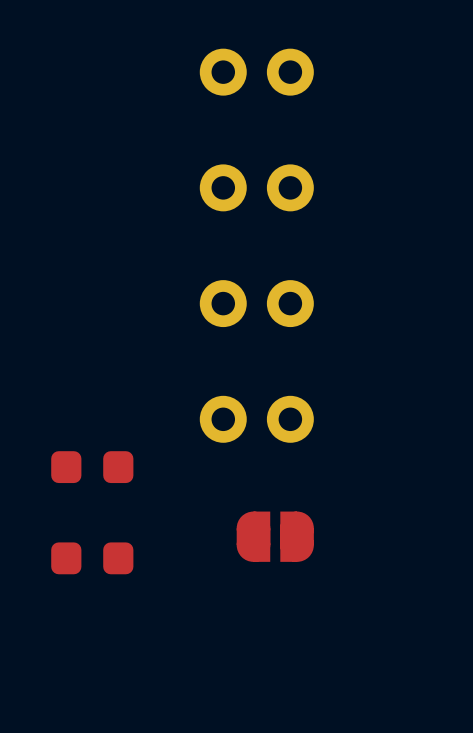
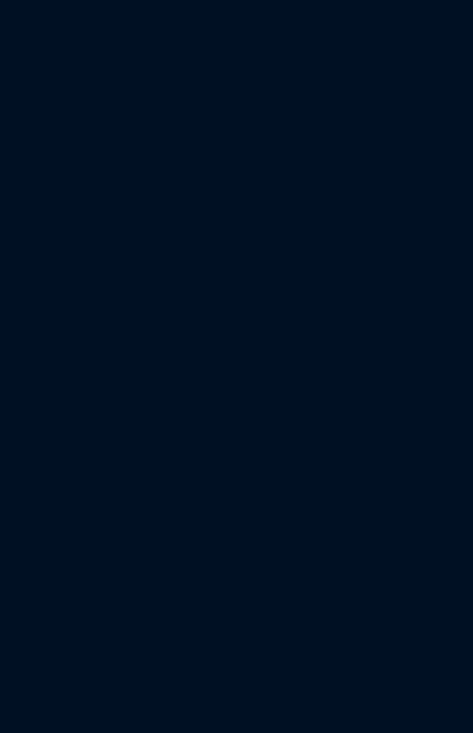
part: (256, 72) -> none
part: (256, 187) -> none
part: (256, 303) -> none
part: (256, 419) -> none
part: (92, 467) -> none
part: (275, 536) -> none
part: (92, 558) -> none

